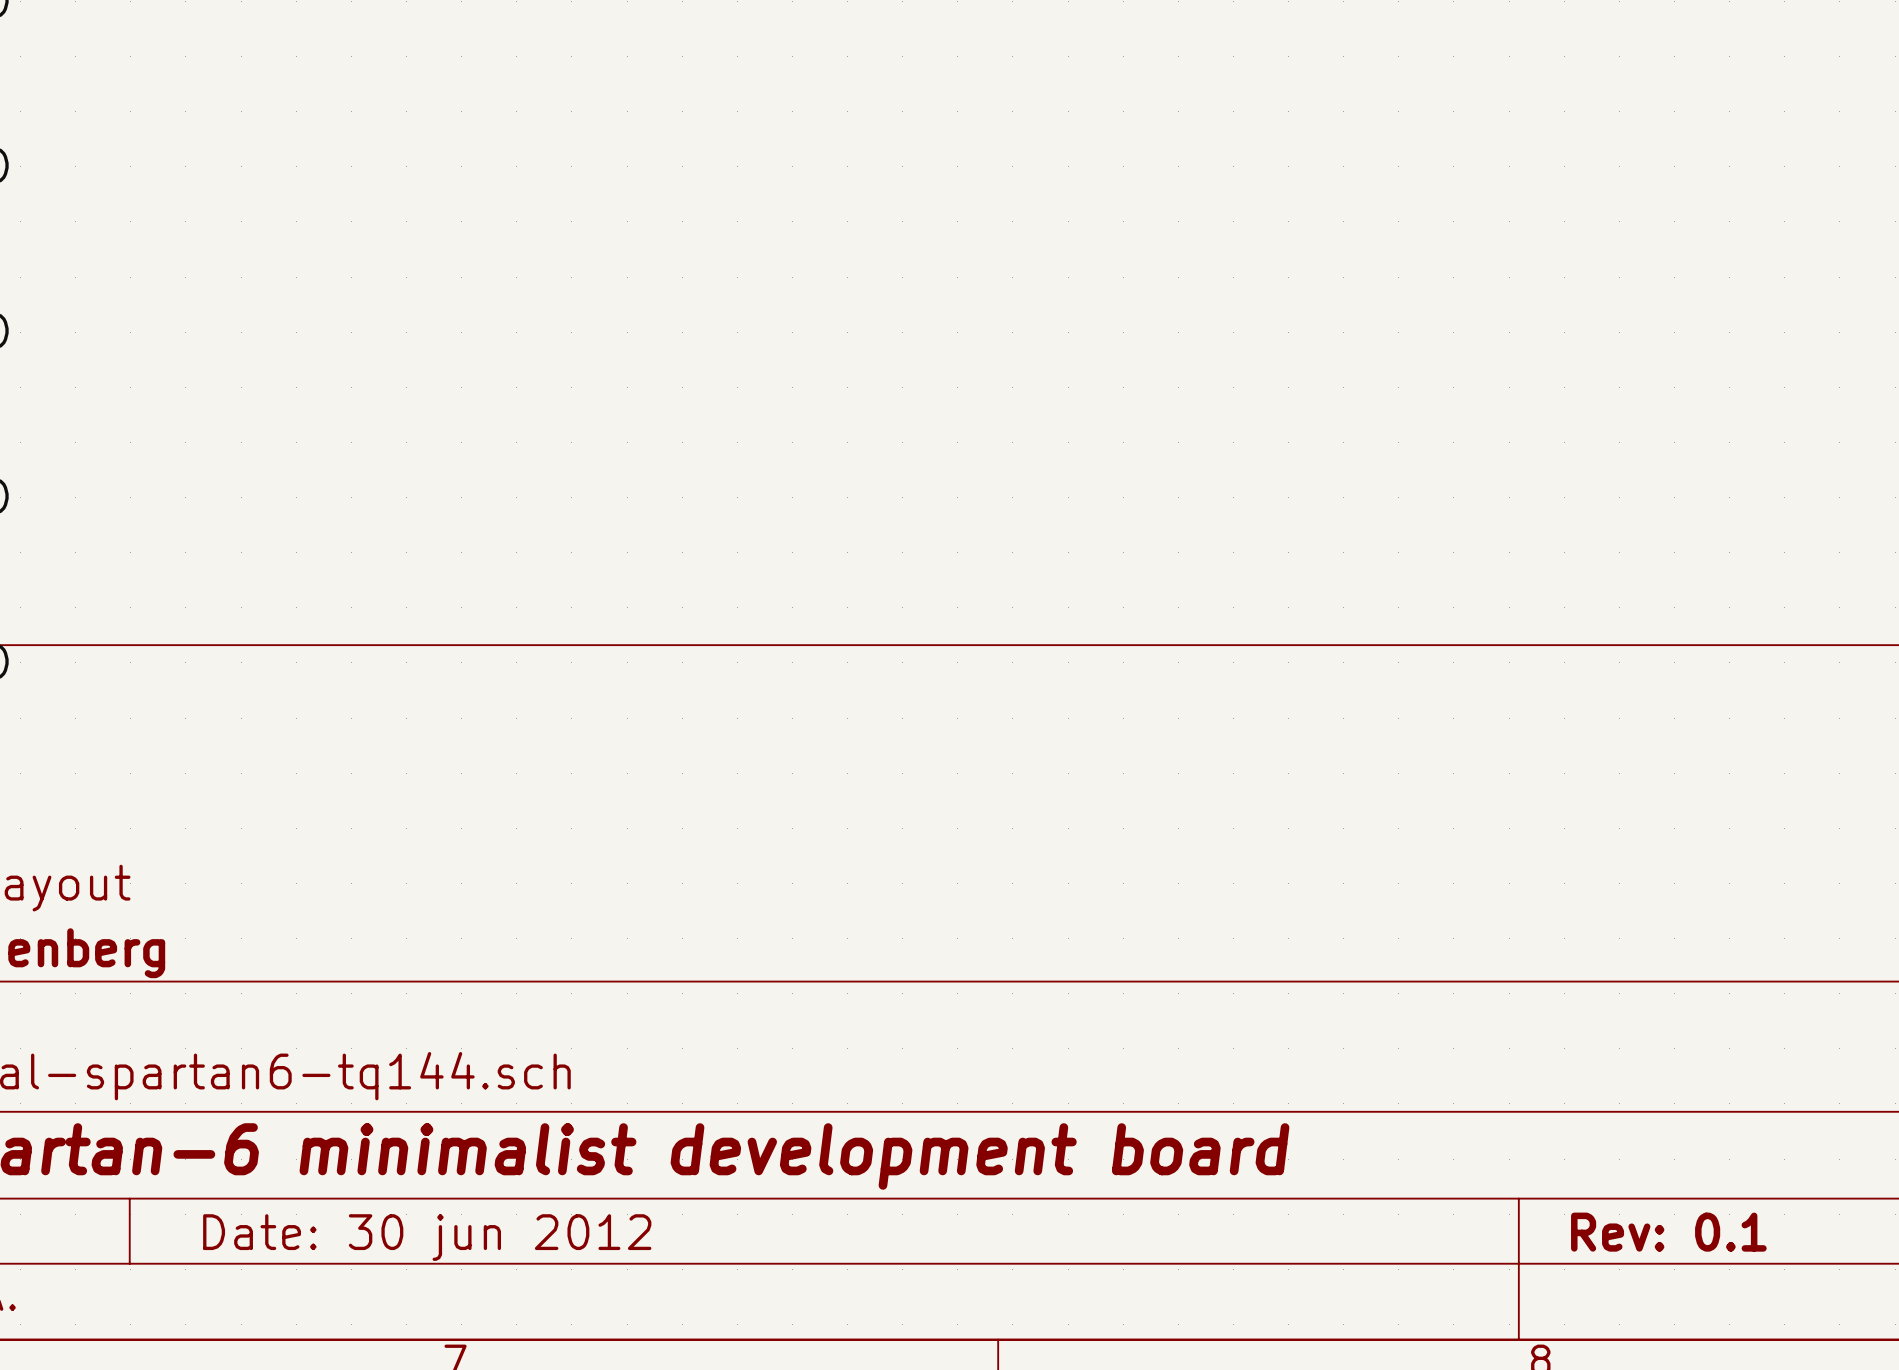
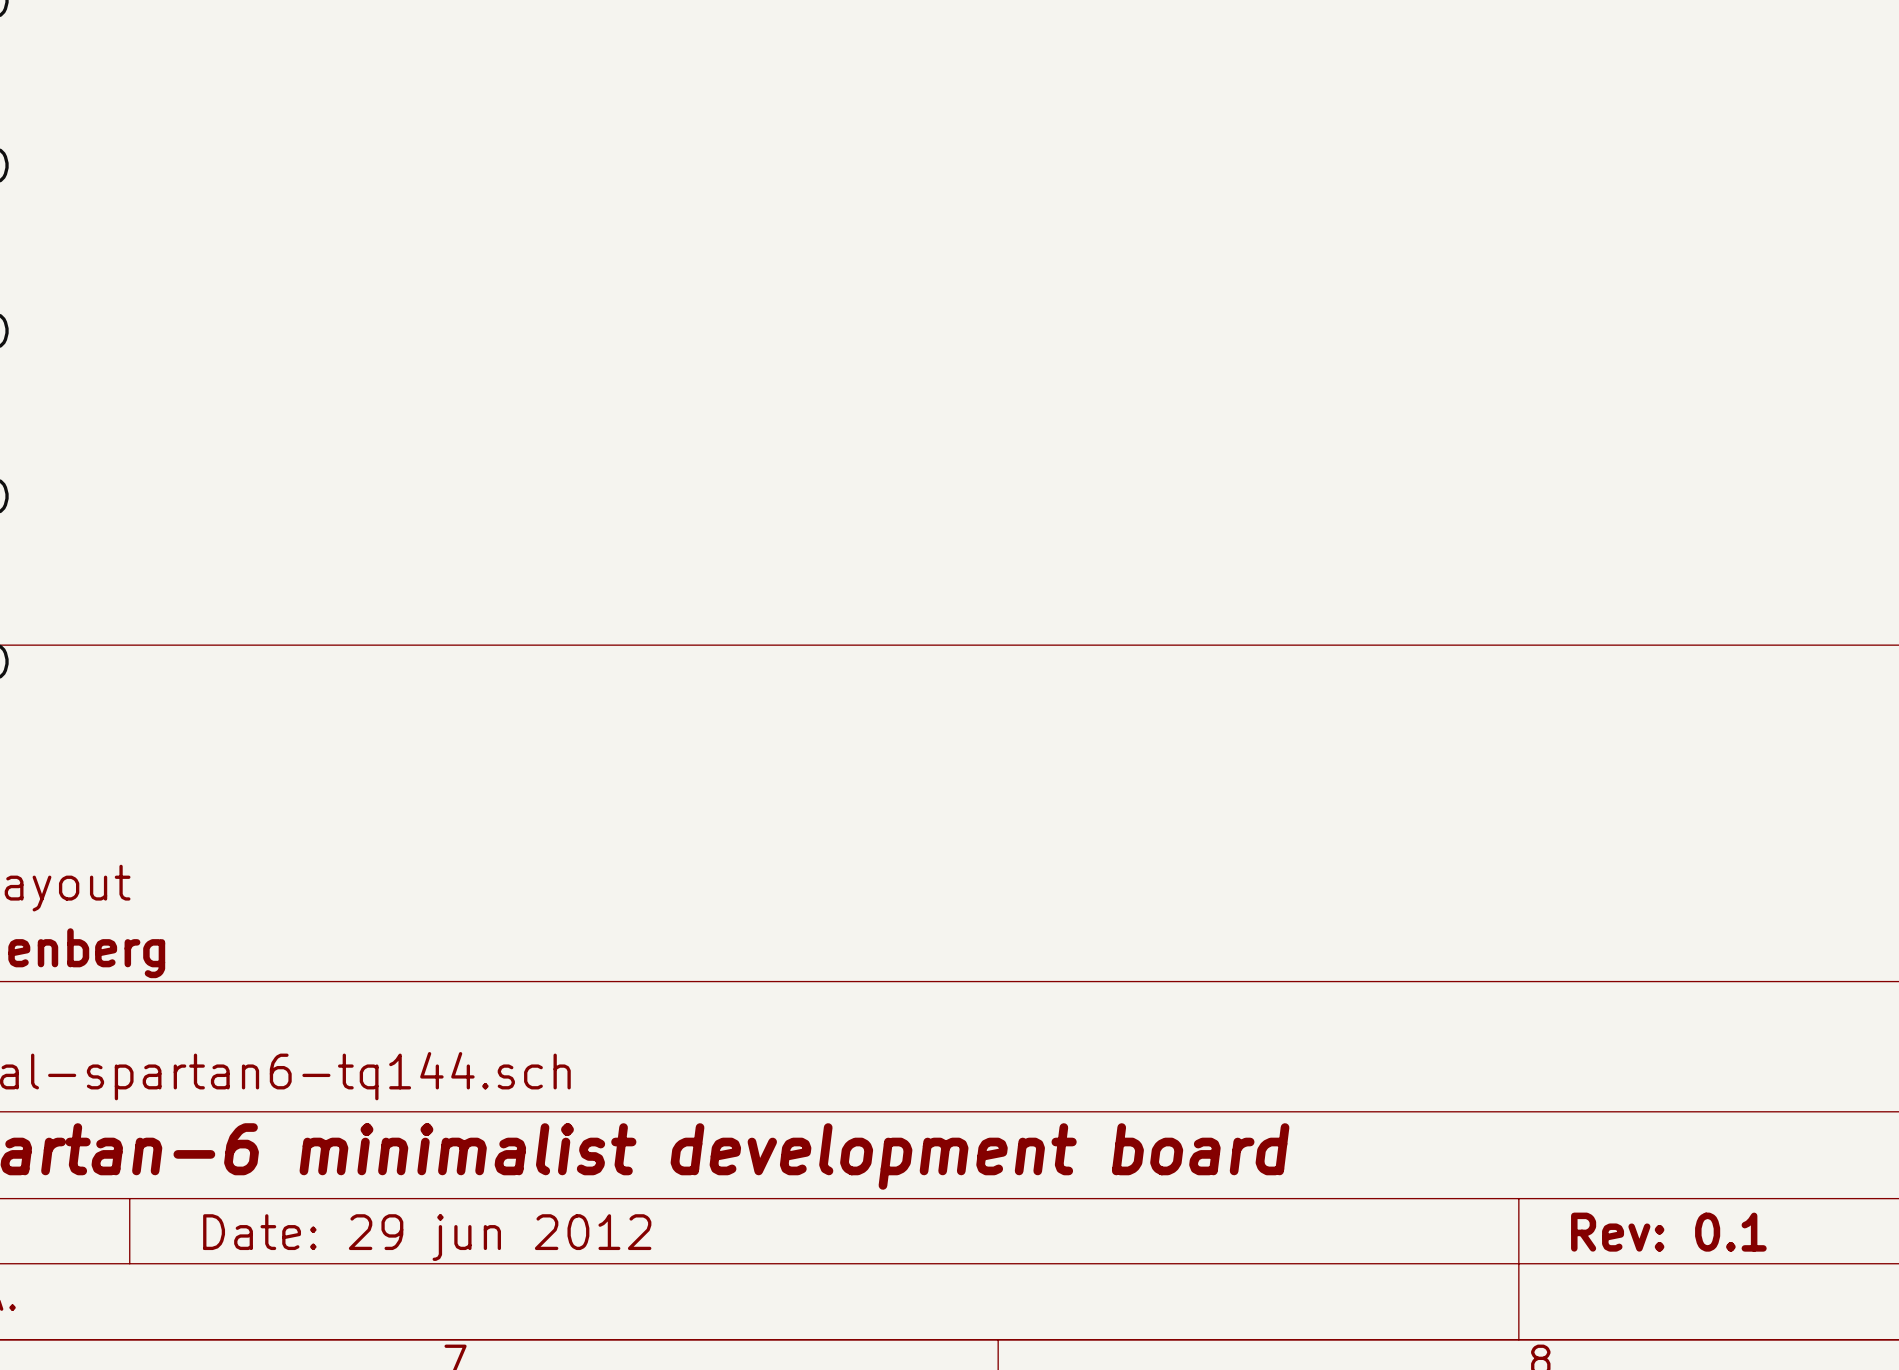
title block: Date: 30 jun 2012 (427, 1237) -> Date: 29 jun 2012 (427, 1237)

